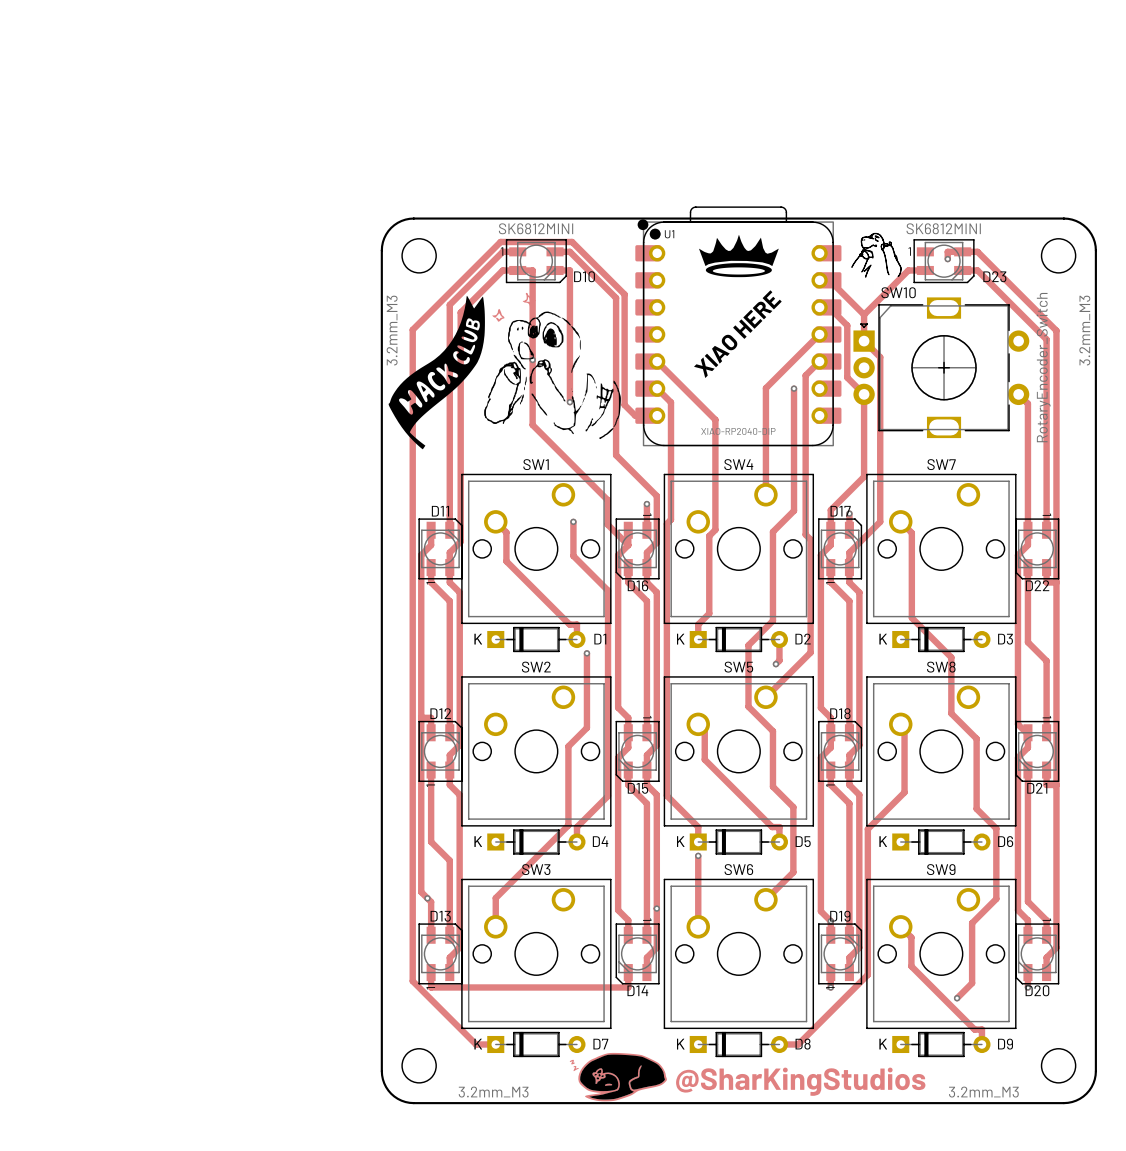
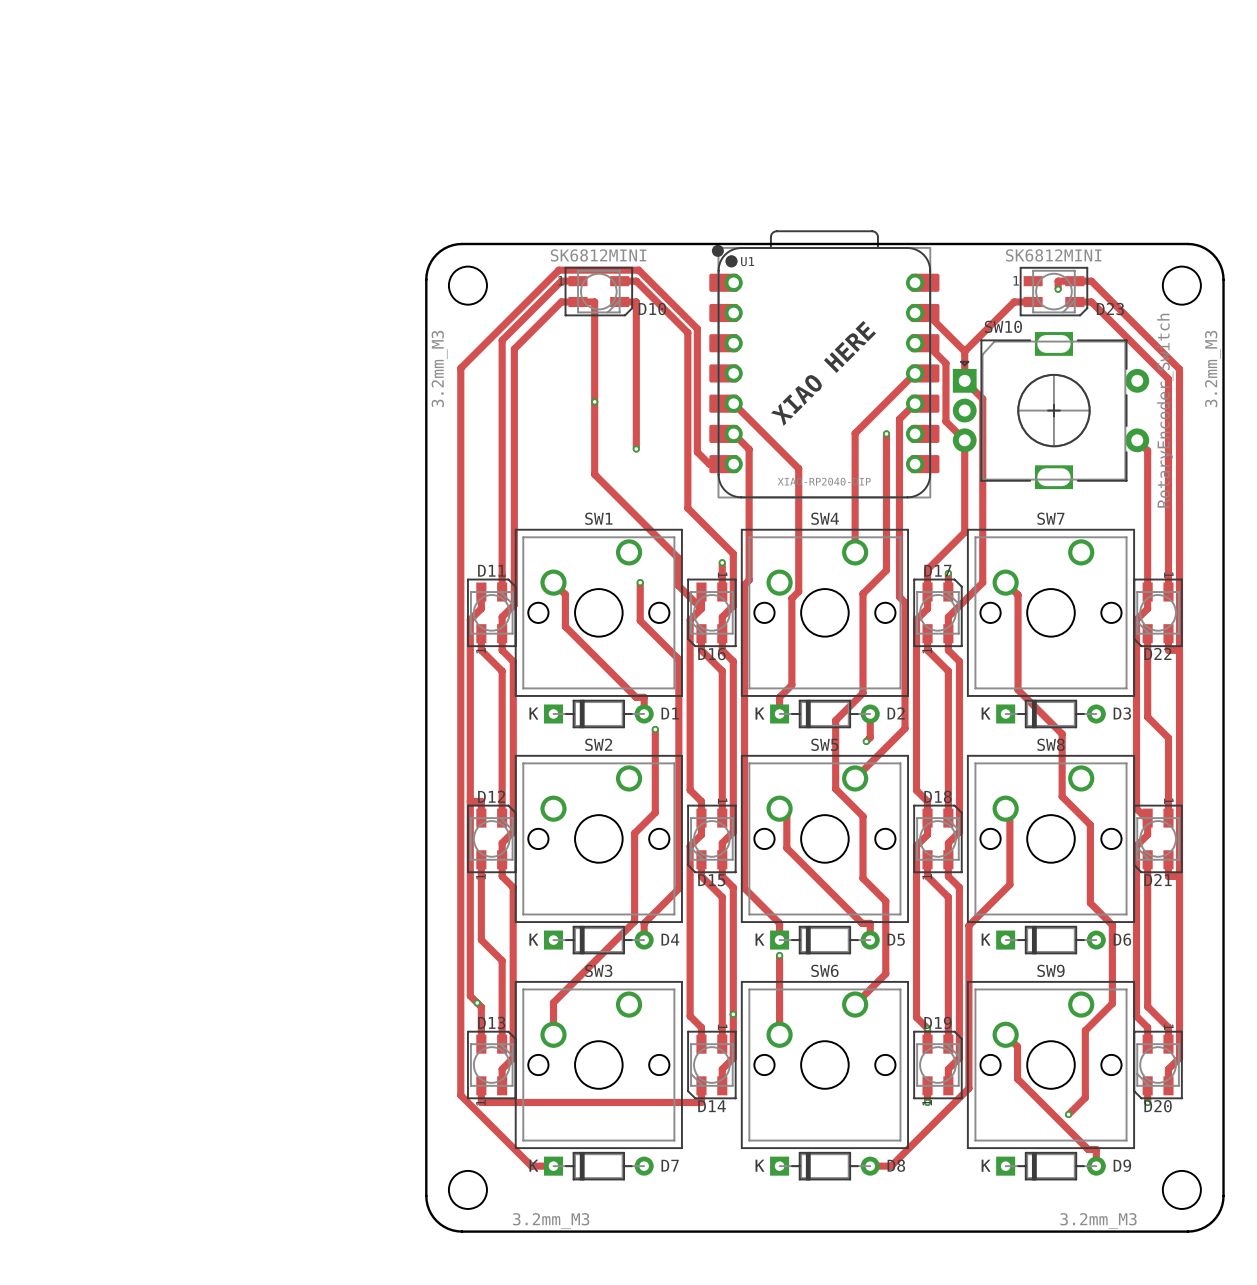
drawing: [851, 232, 902, 278] -> none
drawing: [699, 234, 779, 278] -> none
drawing: [388, 292, 621, 450] -> none
drawing: [569, 1052, 667, 1102] -> none
text: @SharKingStudios (800, 1081) -> none

